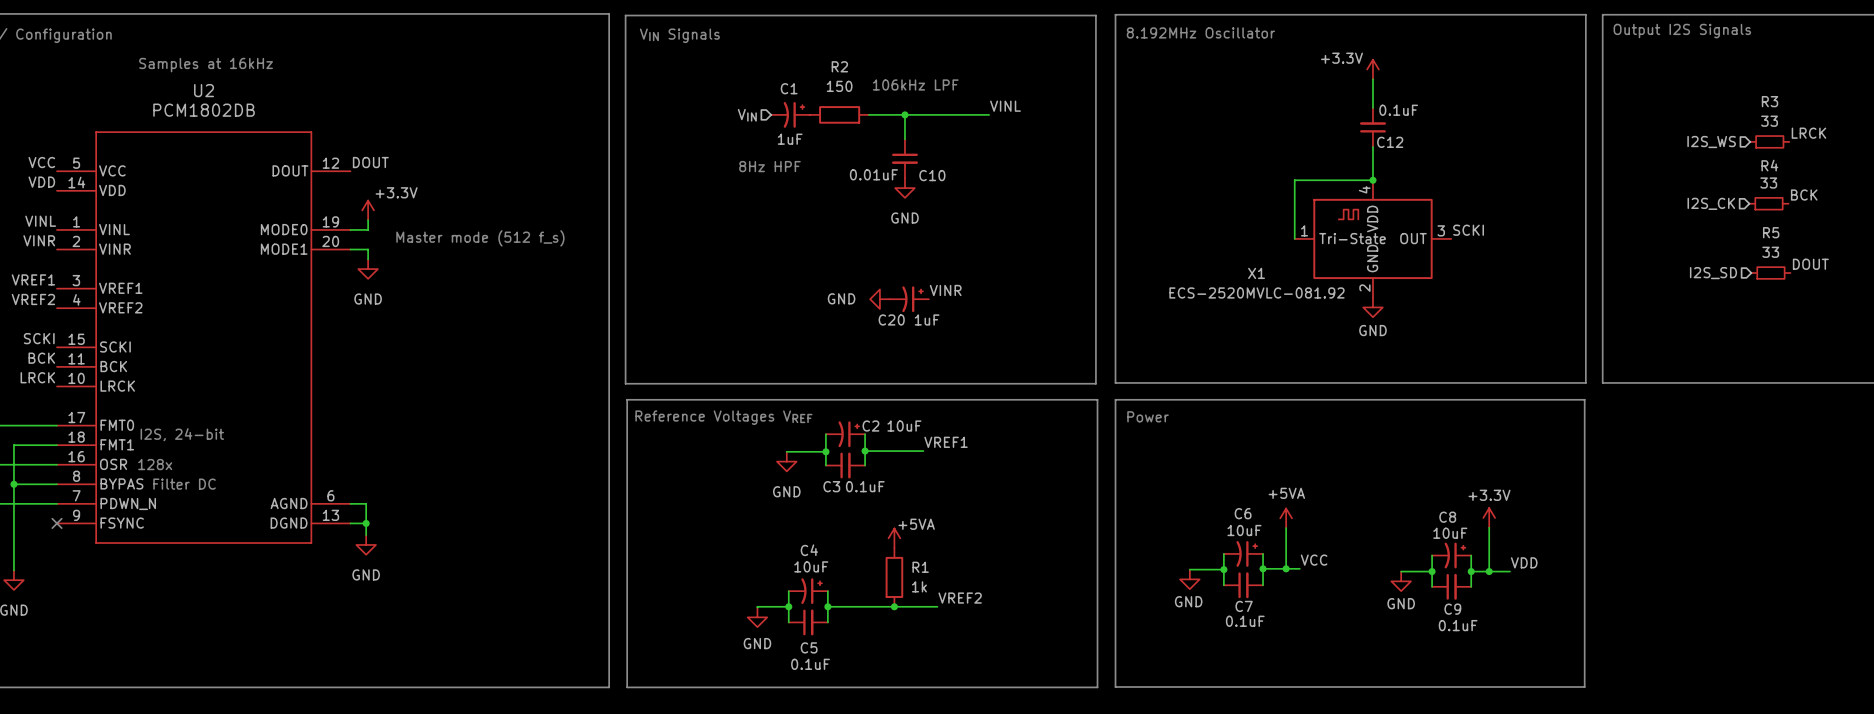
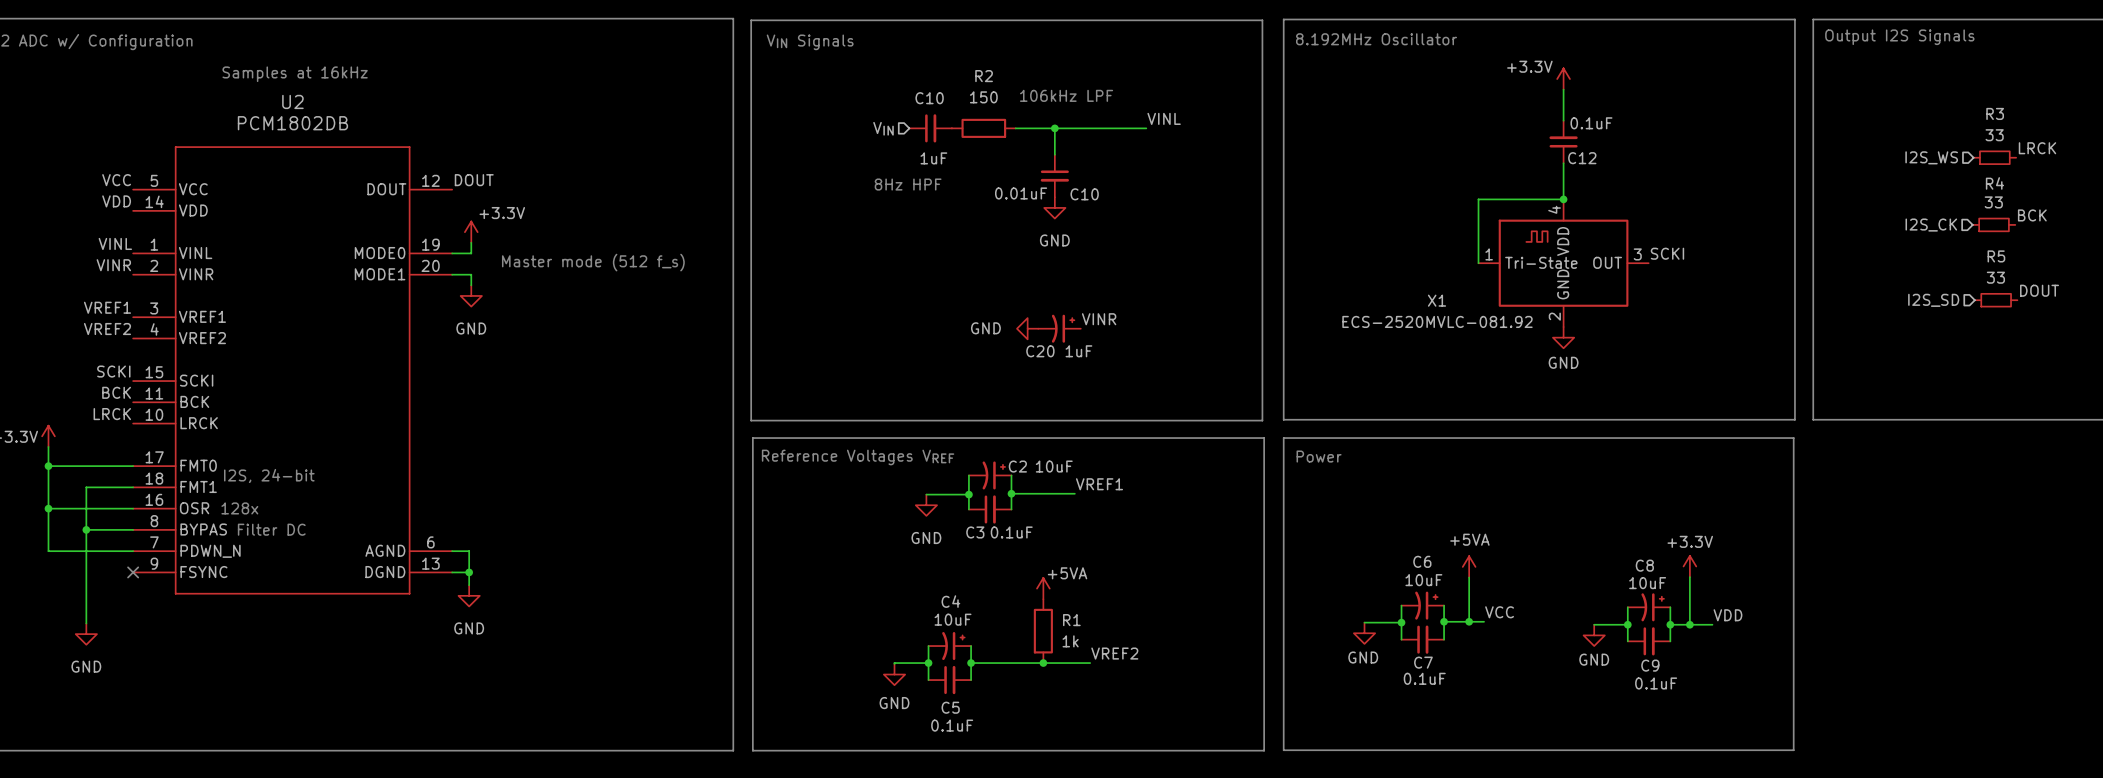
C1: 1uF (790, 114) -> none
C10: none -> 1uF (930, 128)

